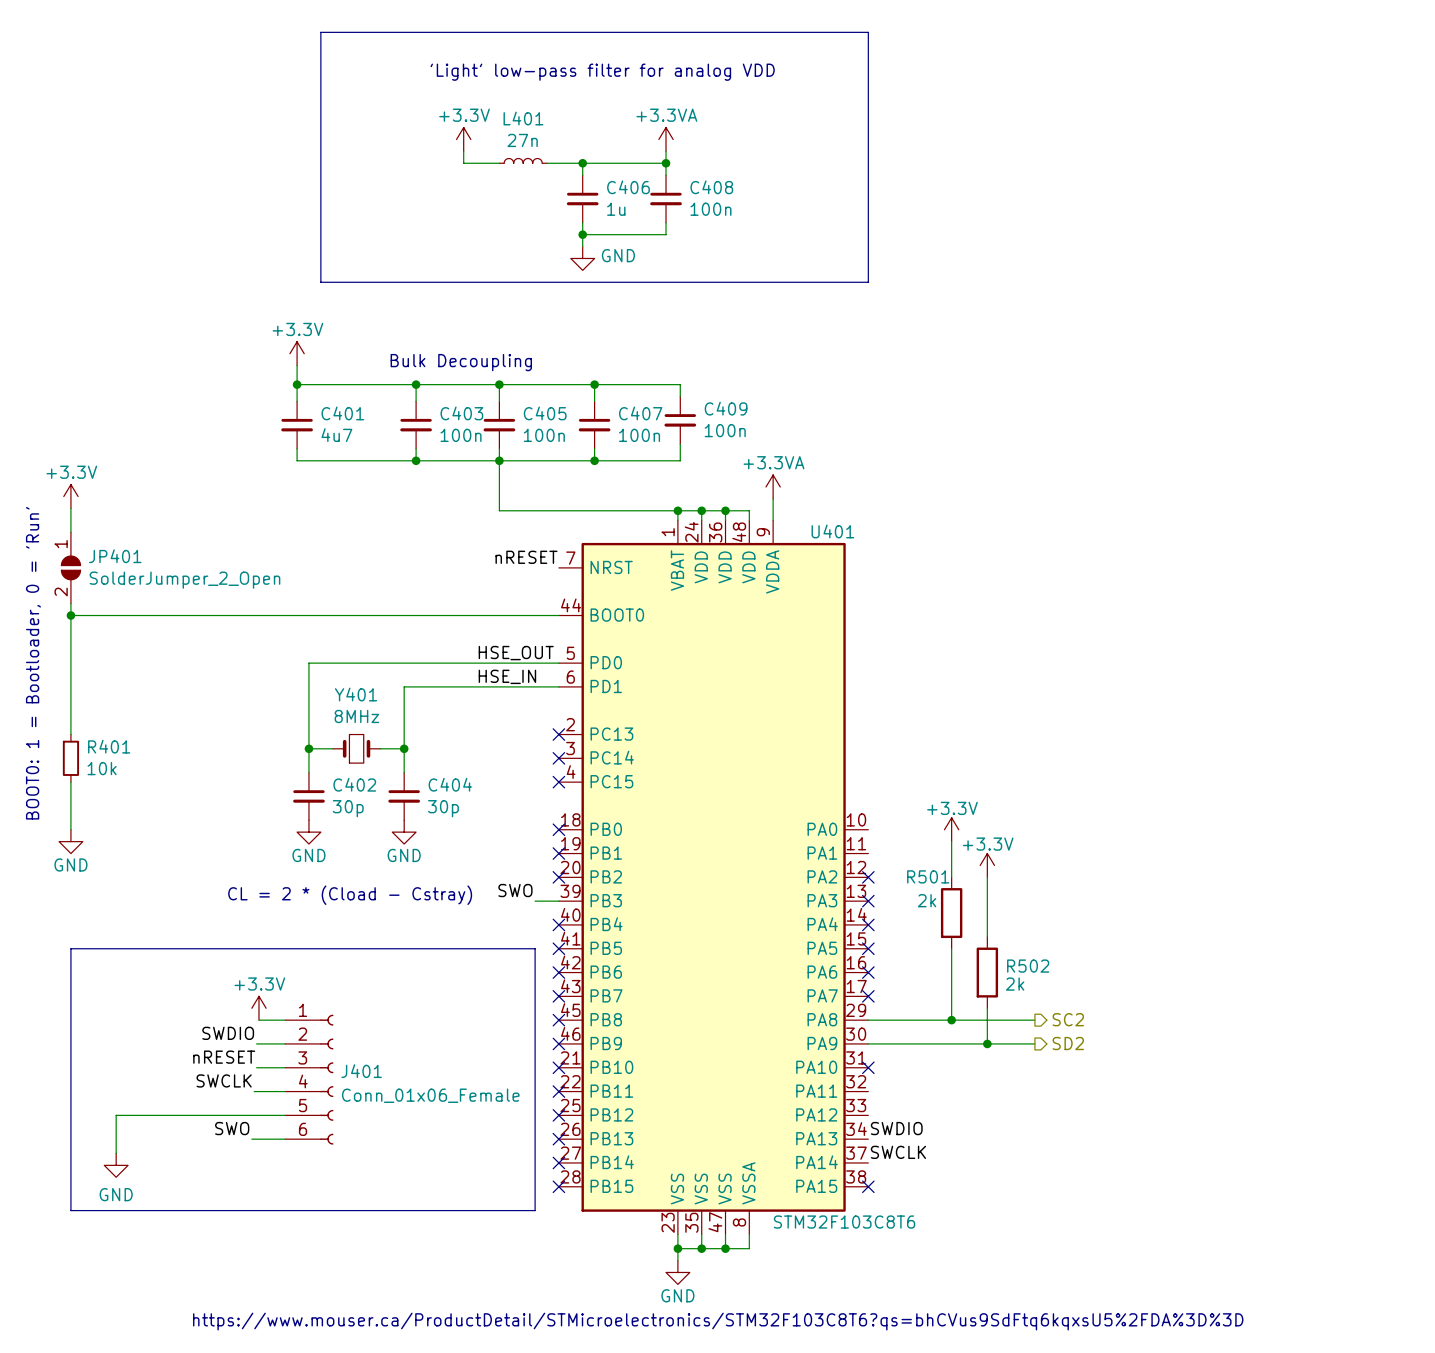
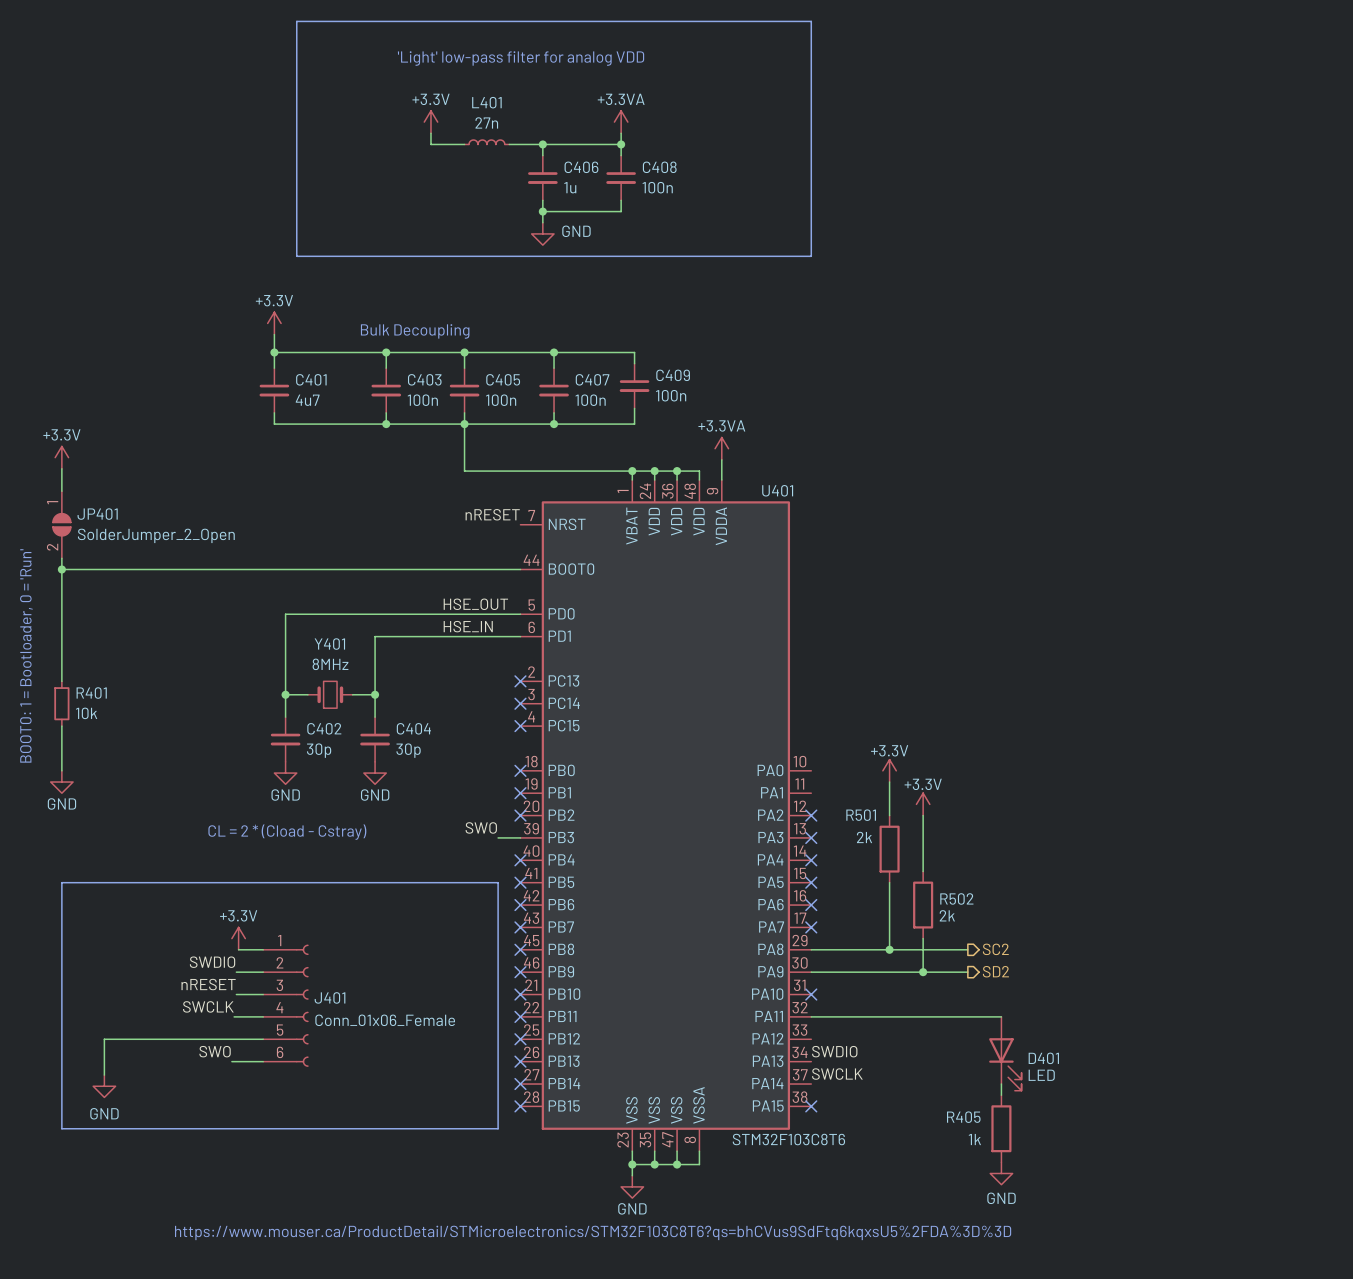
wire: none -> (811, 1016) (1001, 1016)
D401: none -> LED (1005, 1053)
wire: none -> (1001, 1084) (1001, 1095)
R405: none -> 1k (1001, 1128)
power symbol: none -> GND (1001, 1173)

